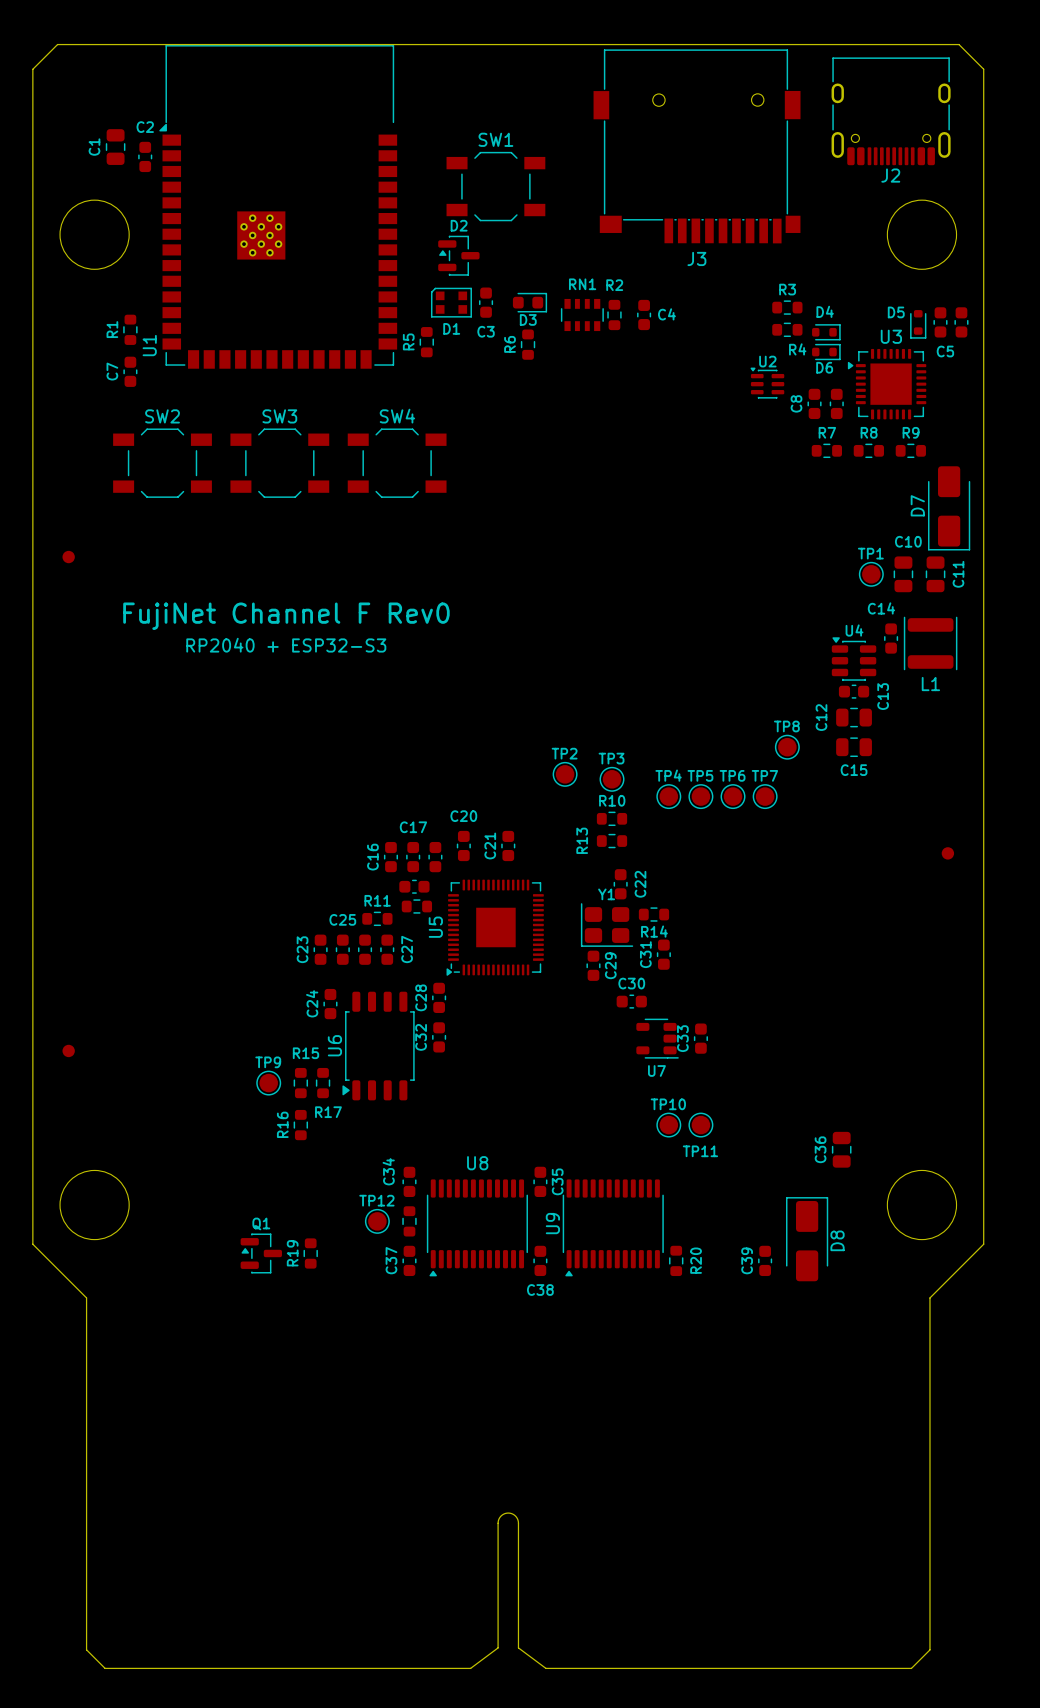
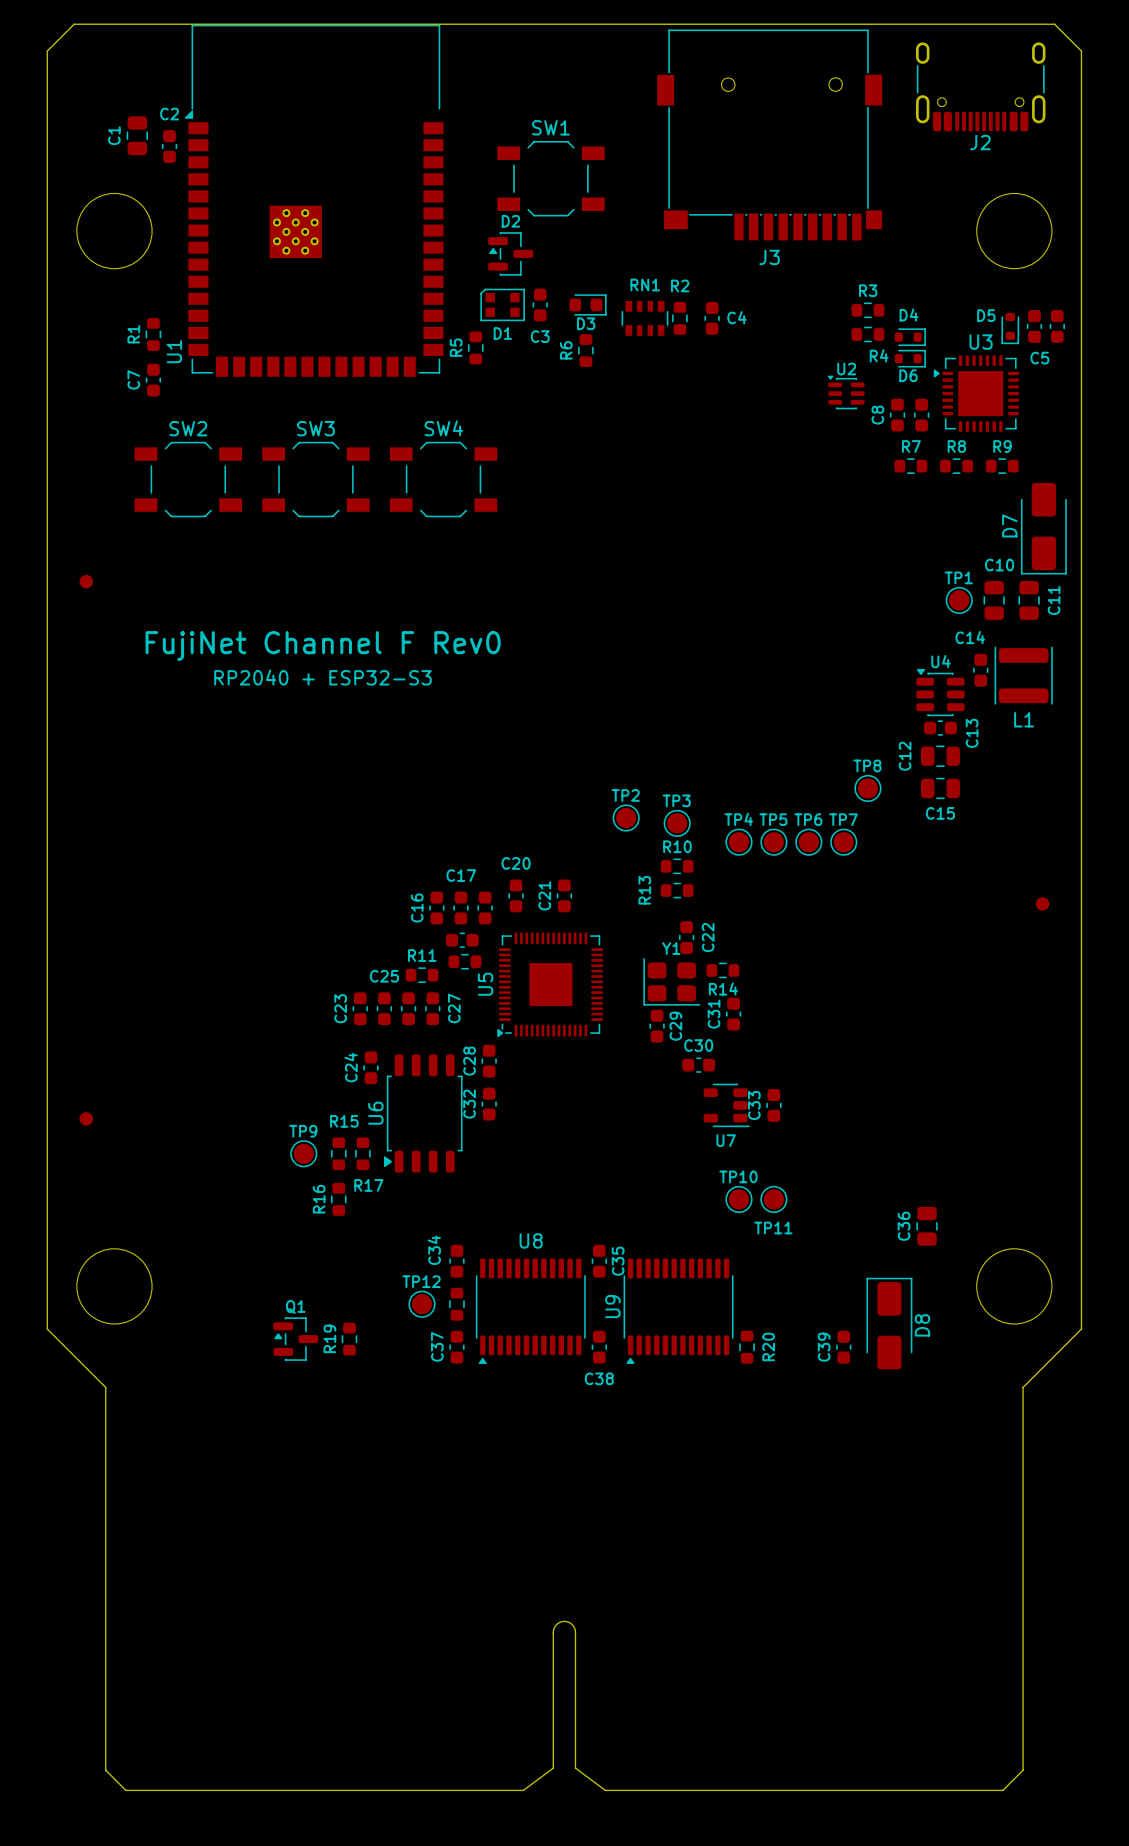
J2 footprint: [831, 57, 951, 166] -> [916, 42, 1046, 132]

